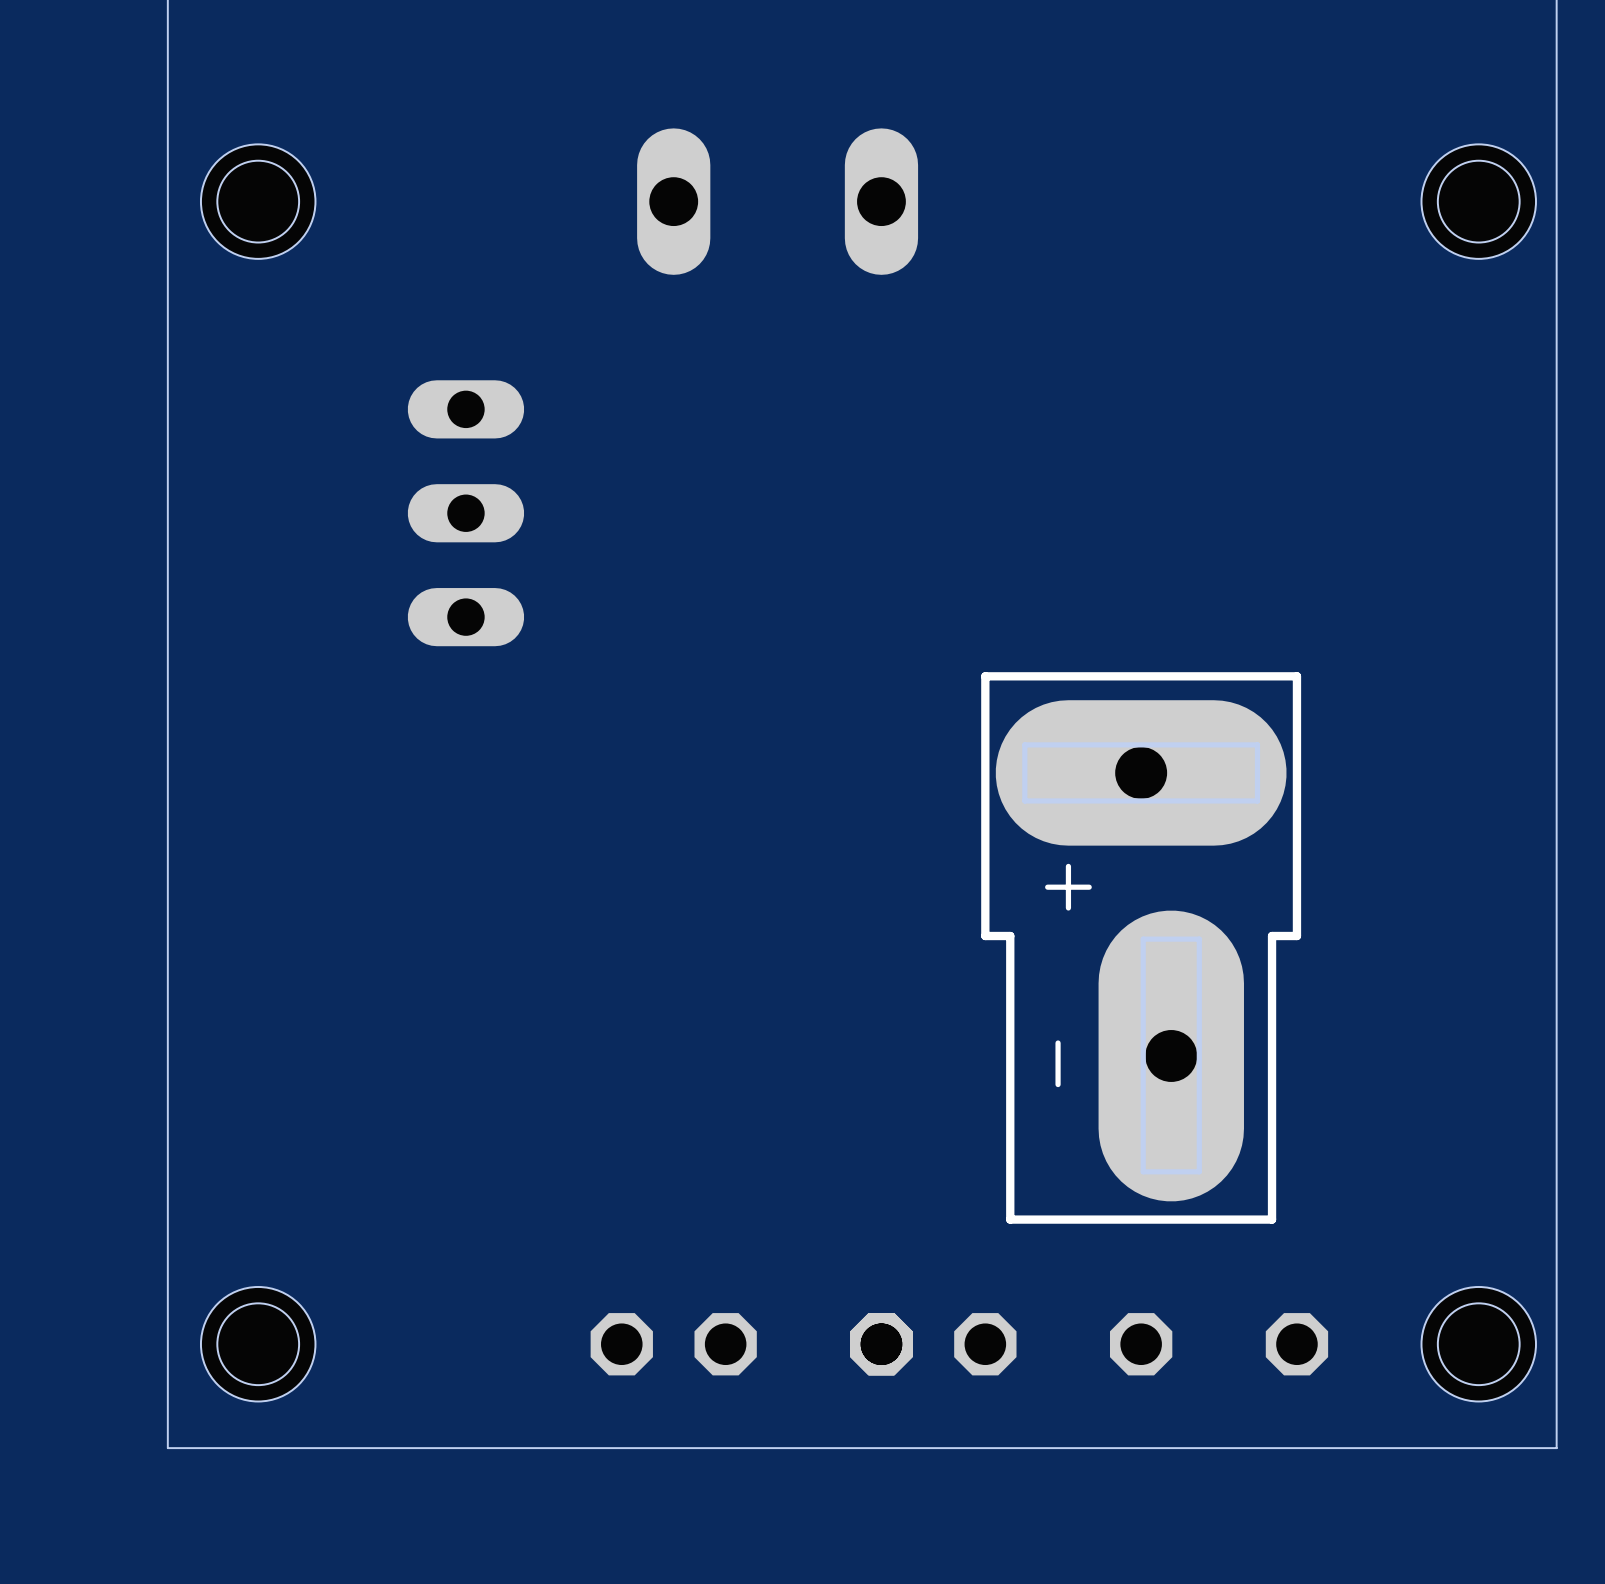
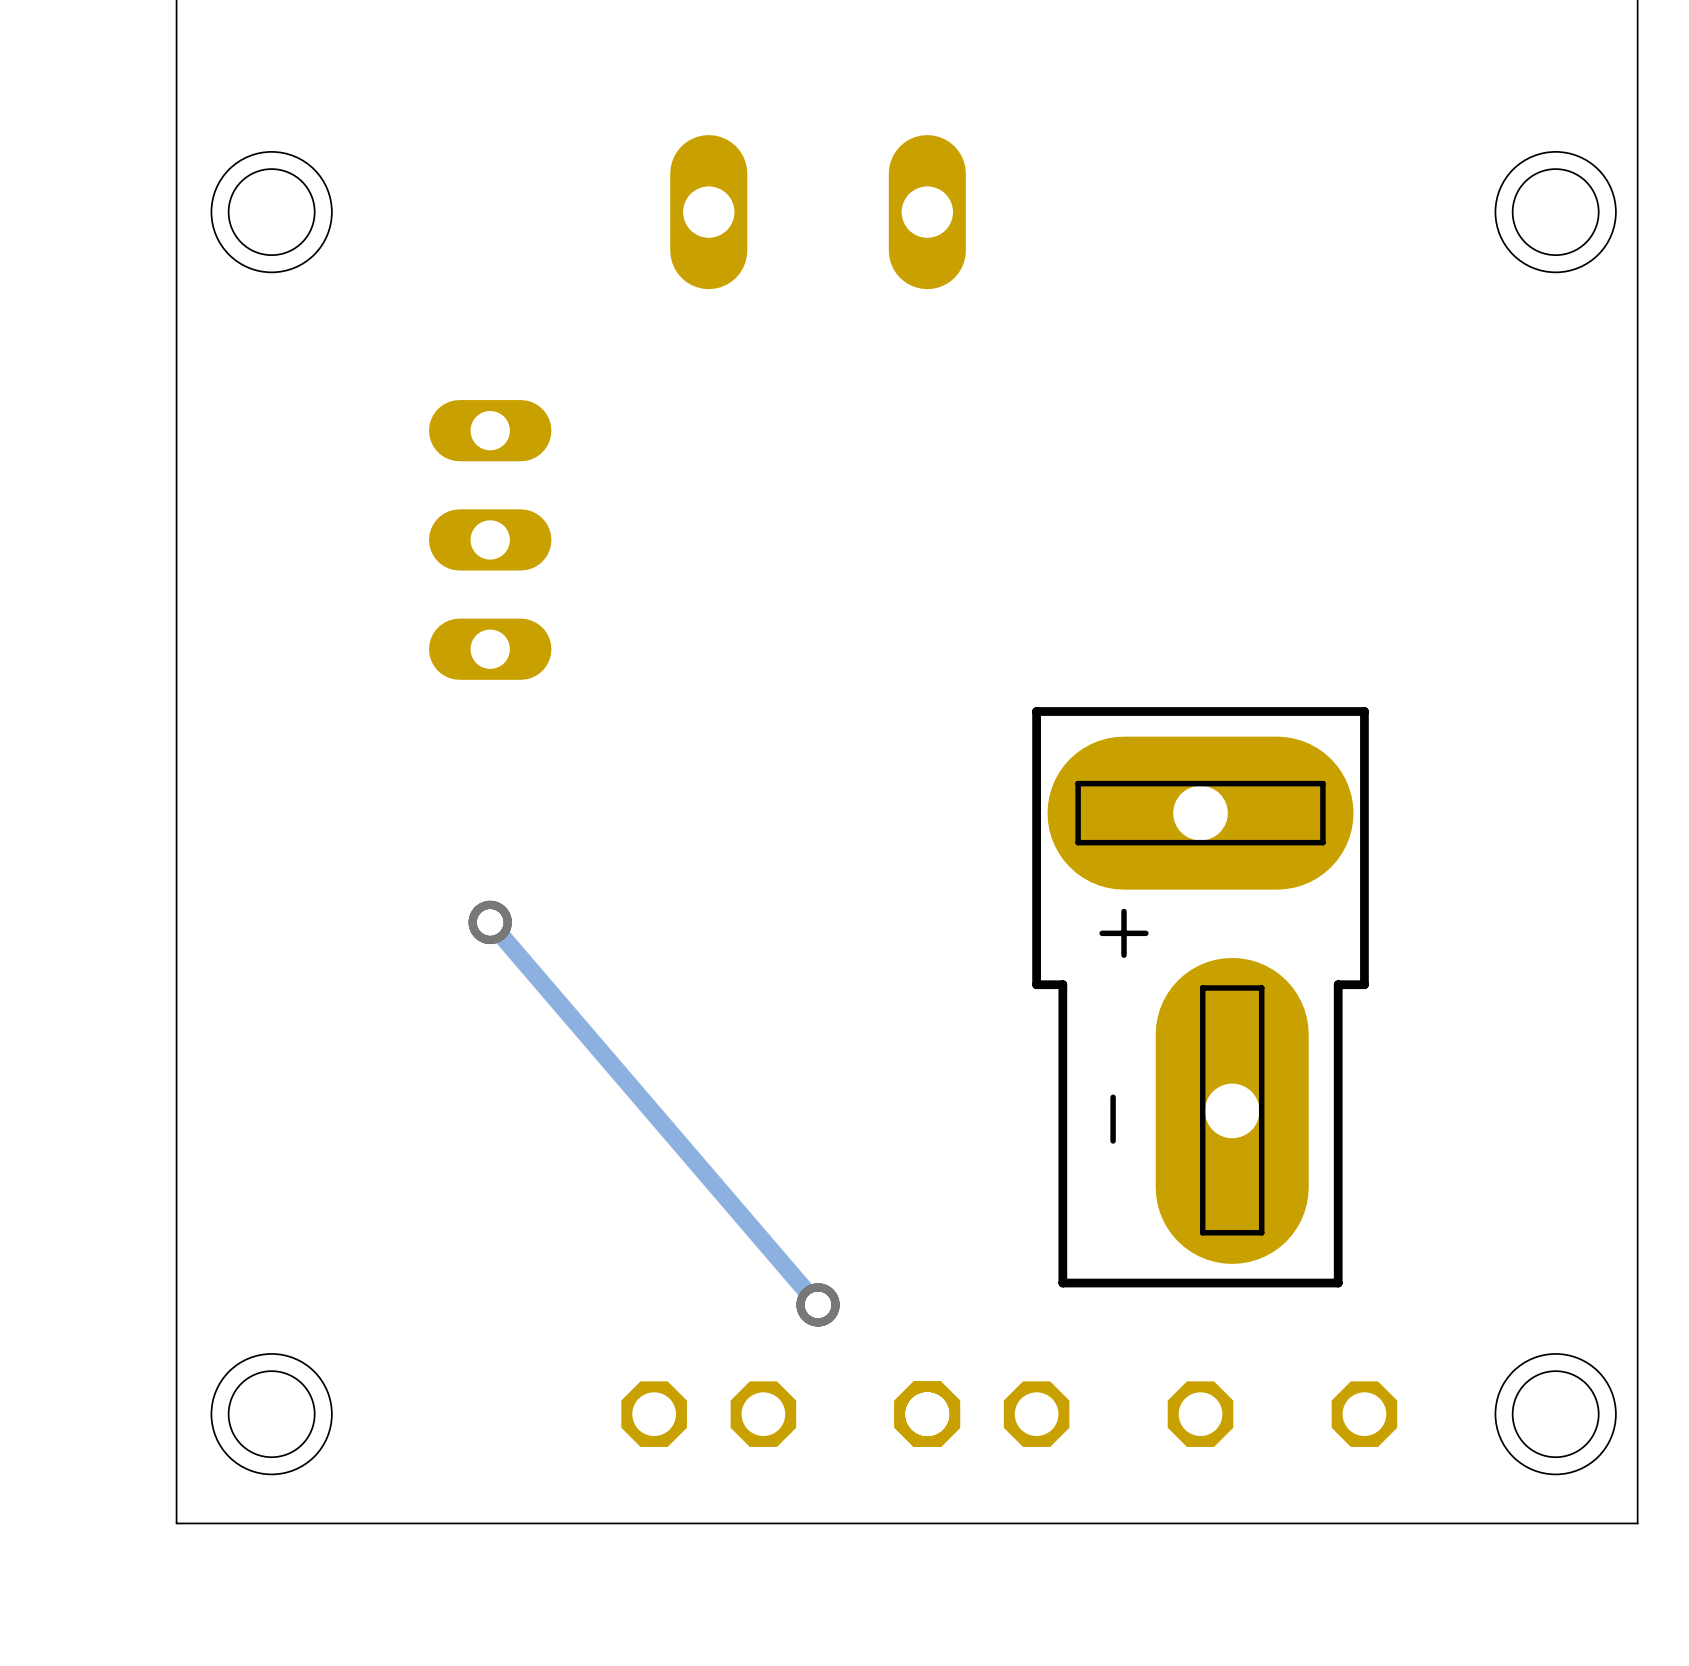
track: none -> (490, 922) (818, 1304)
via: none -> (490, 922)
via: none -> (818, 1304)

